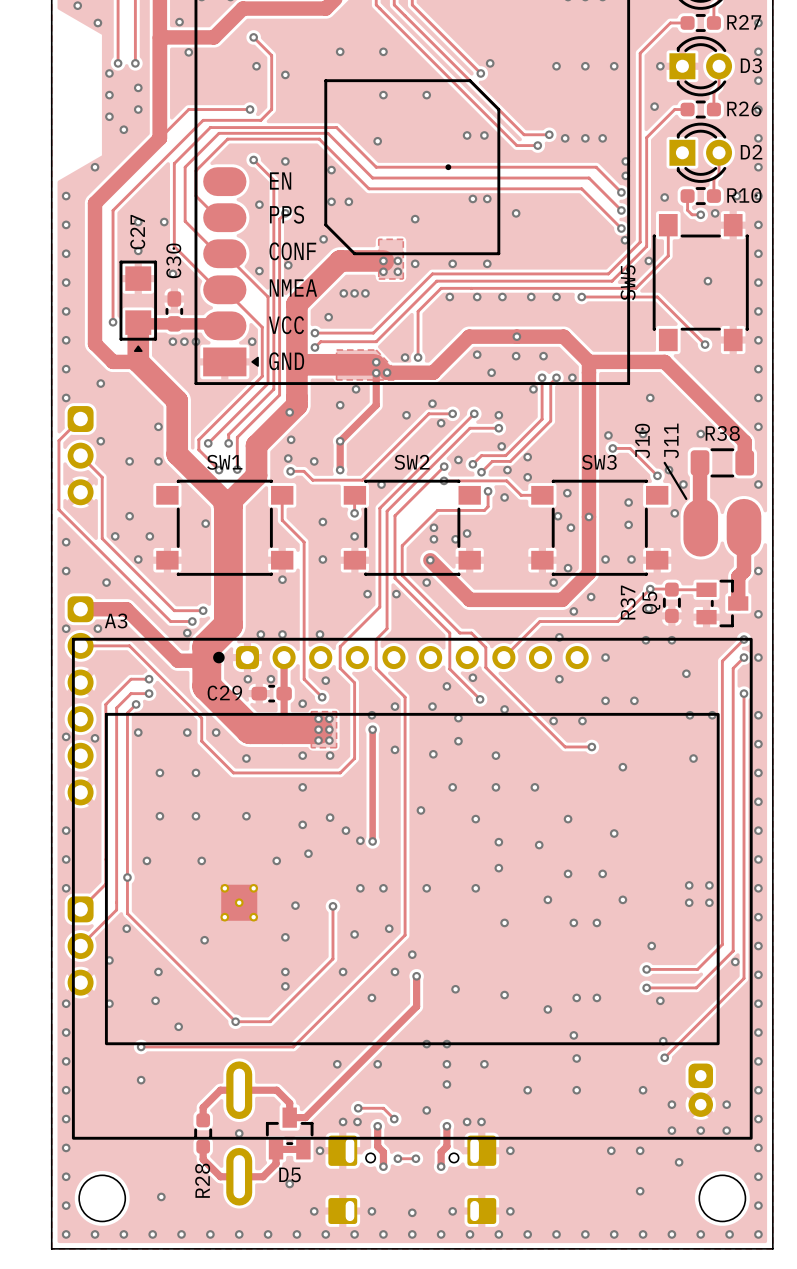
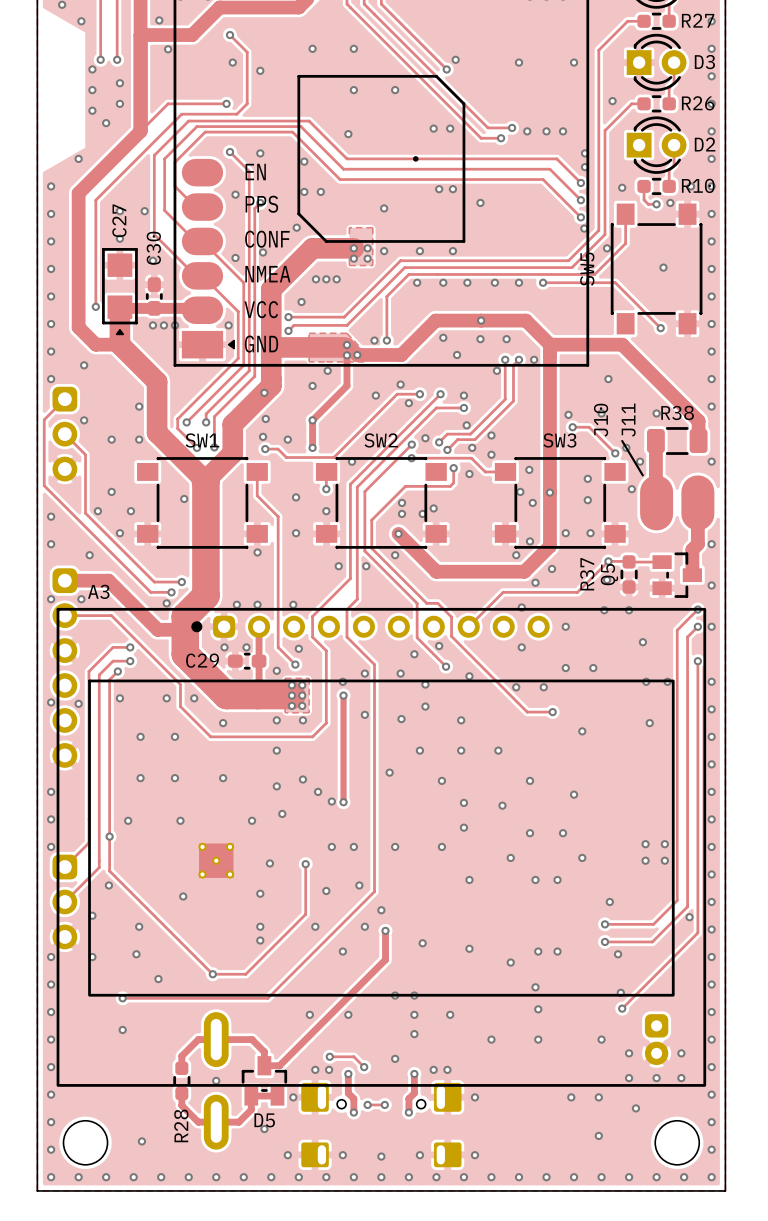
via: (585, 66) -> none
via: (660, 66) -> none

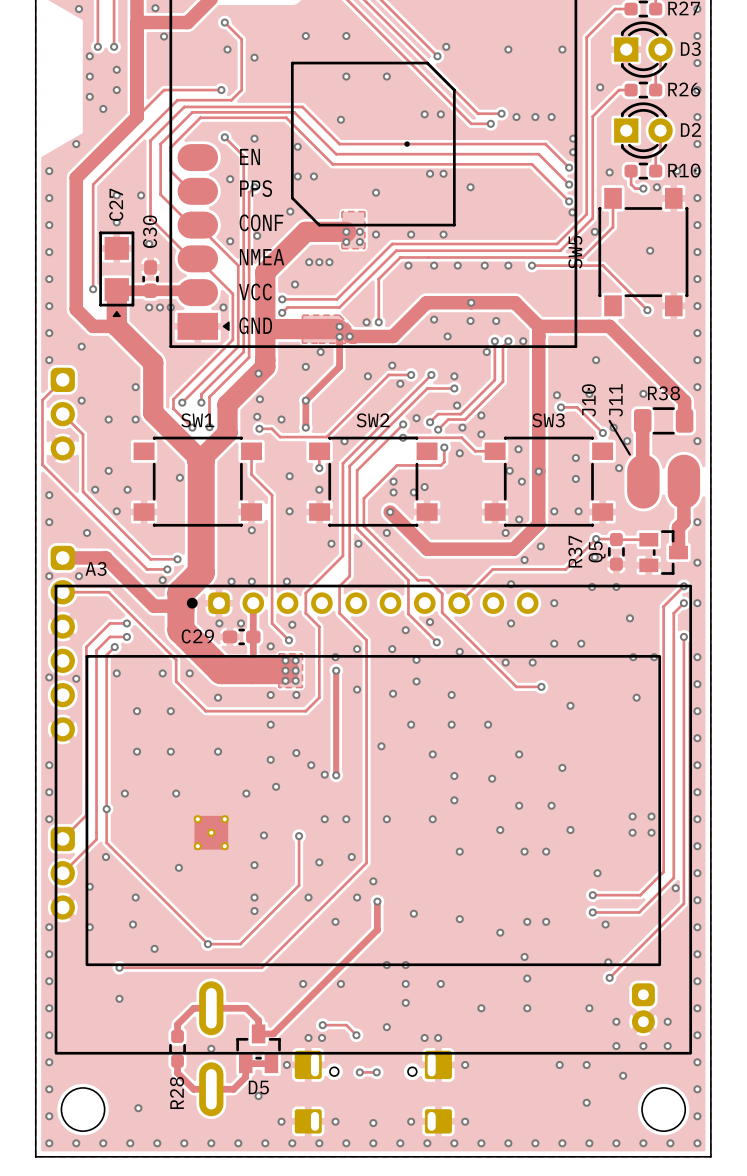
track: (348, 1074) (348, 1093) (353, 1098) (353, 1112) -> none
via: (348, 1074) -> none
track: (414, 1074) (414, 1093) (408, 1098) (408, 1112) -> none
via: (414, 1074) -> none
via: (353, 1112) -> none
via: (408, 1112) -> none

